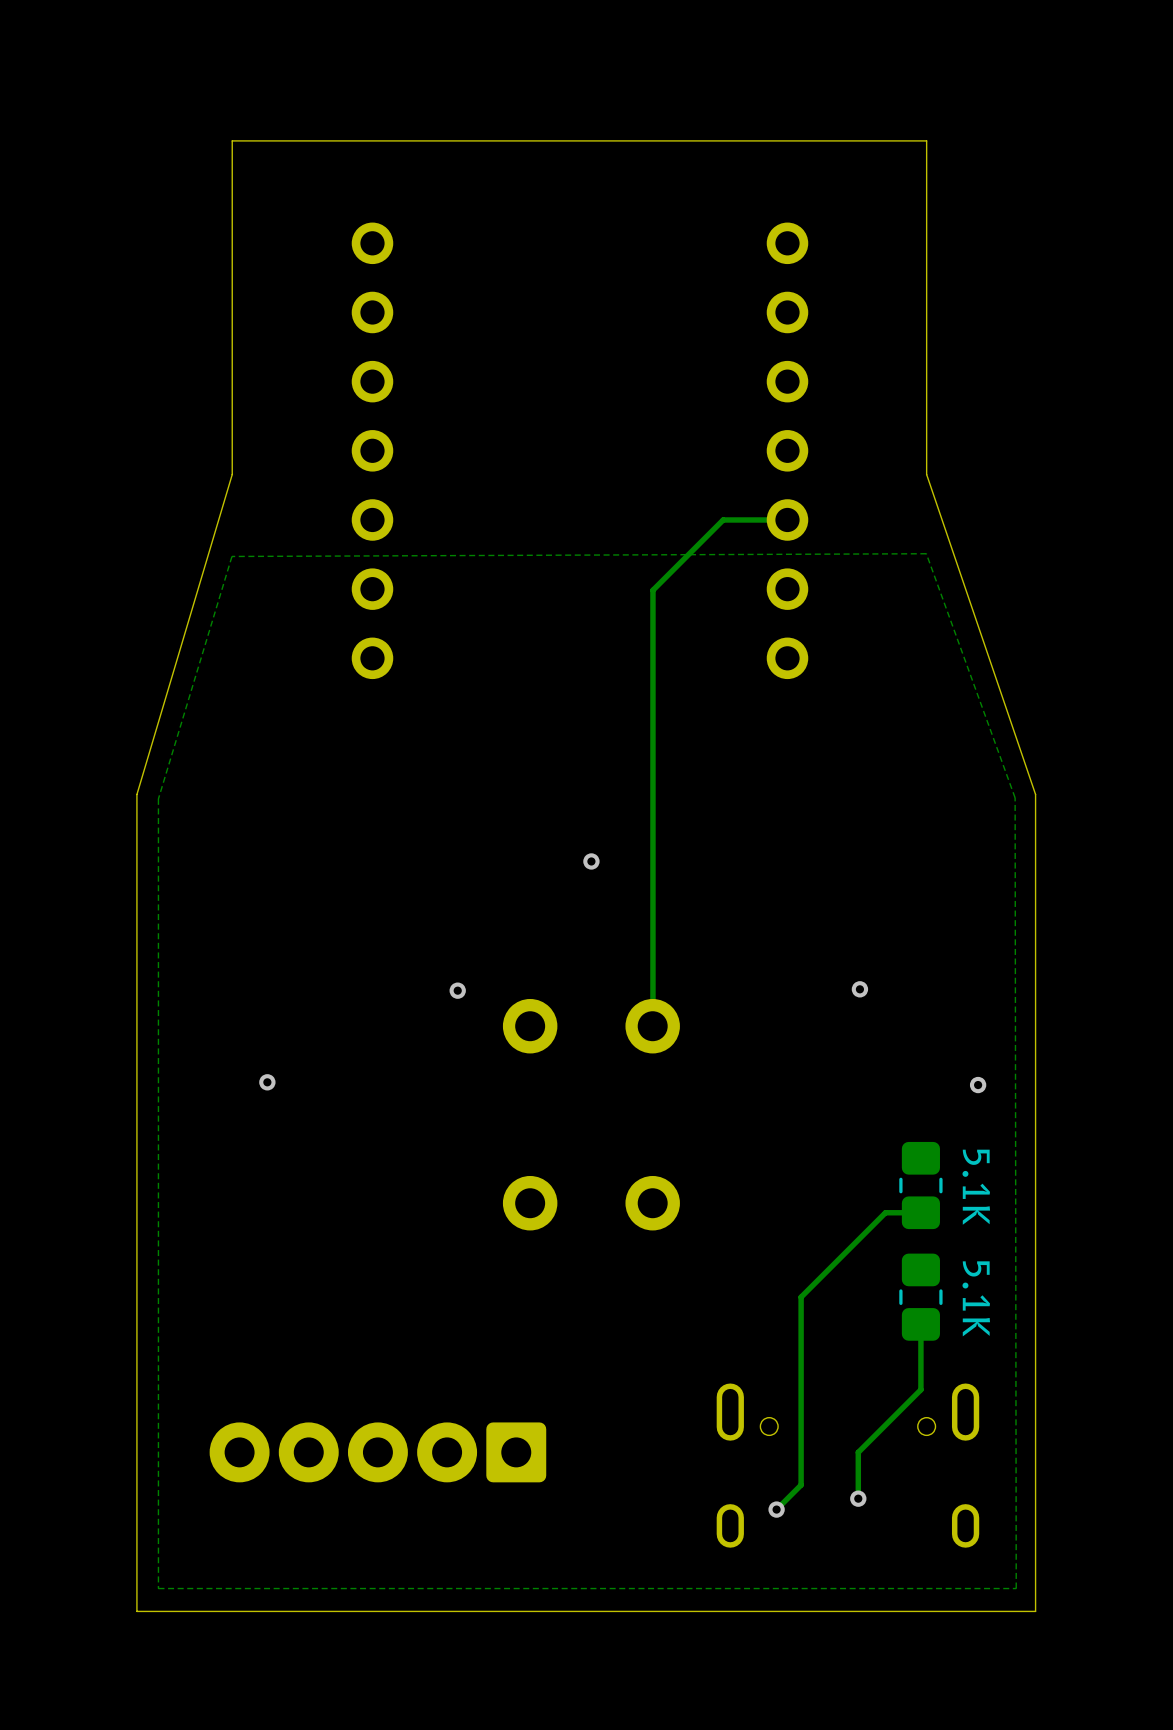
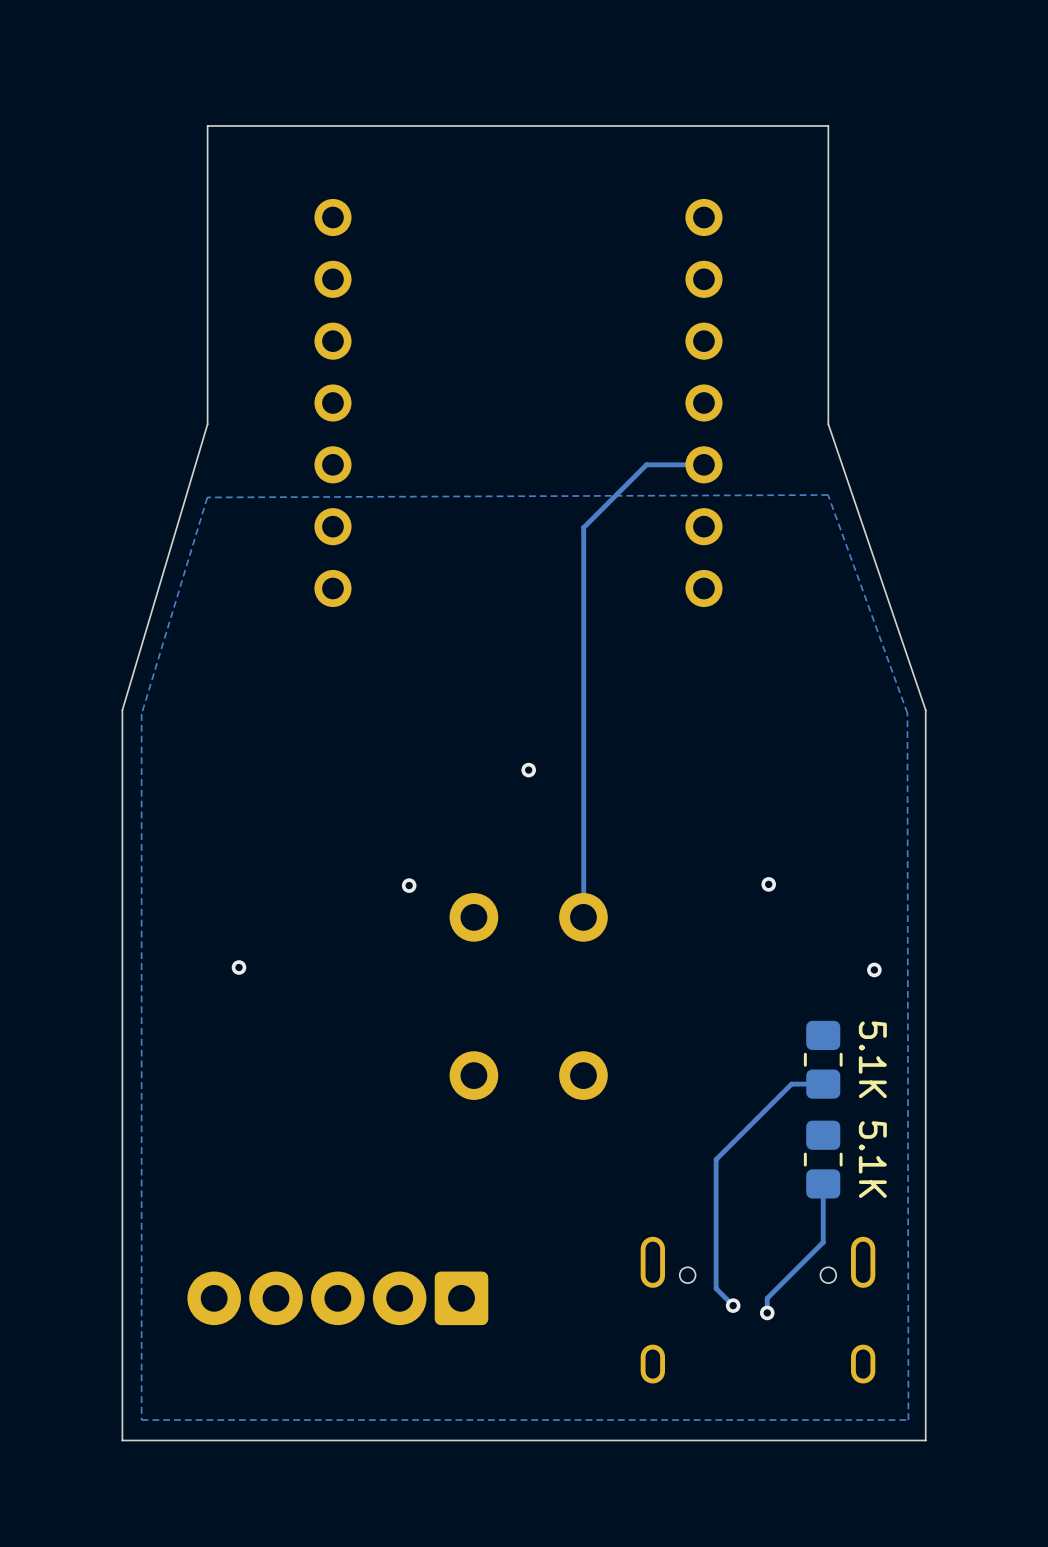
track: (801, 1441) (801, 1485) (776, 1509) -> (716, 1288) (733, 1305)
via: none -> (733, 1305)
track: (858, 1468) (858, 1498) -> none
via: none -> (767, 1312)
via: (858, 1498) -> none
via: (776, 1509) -> none

